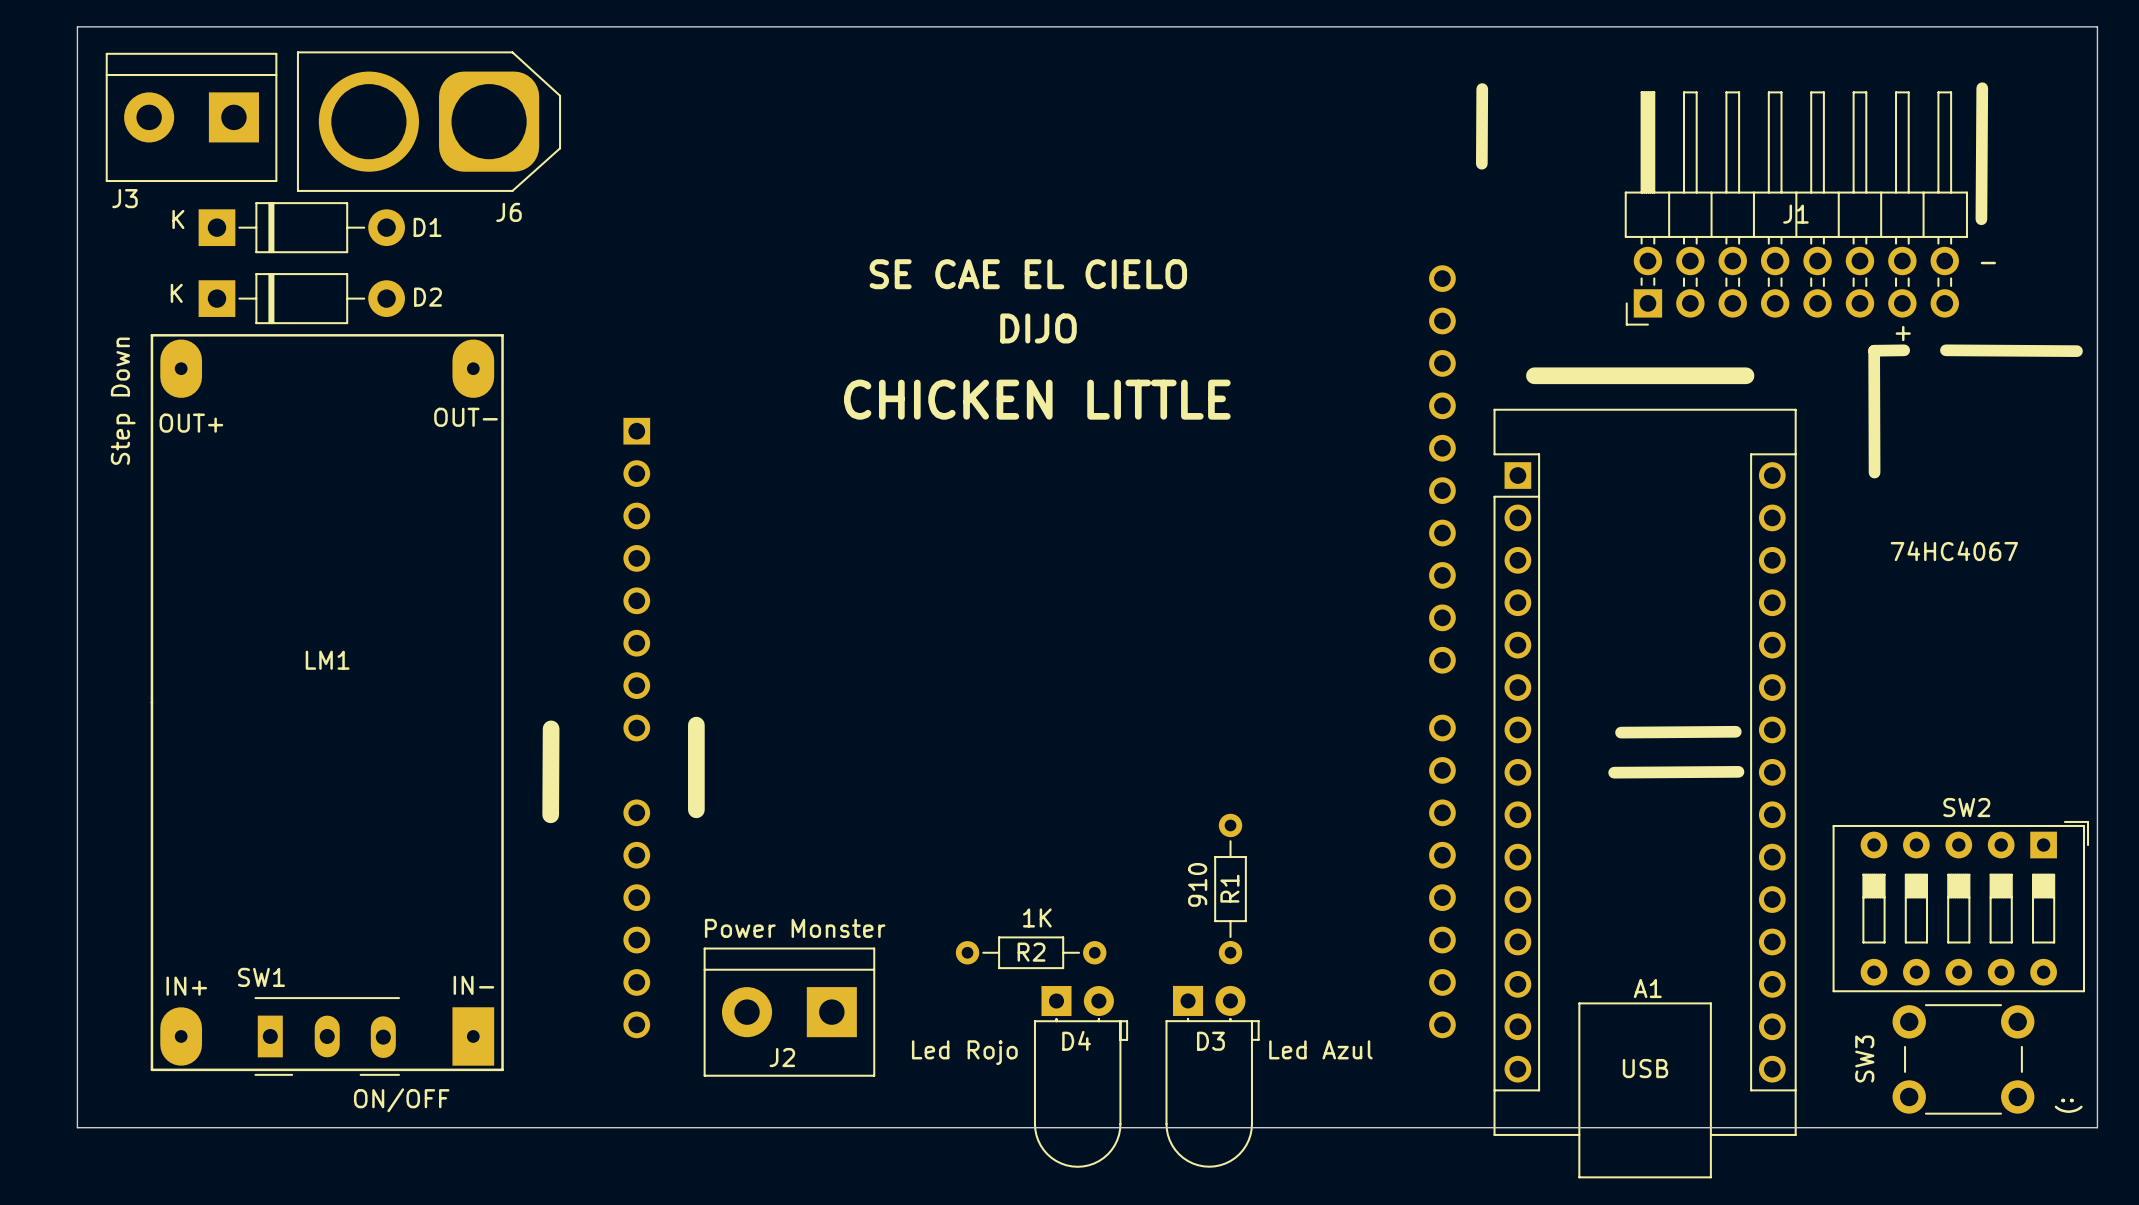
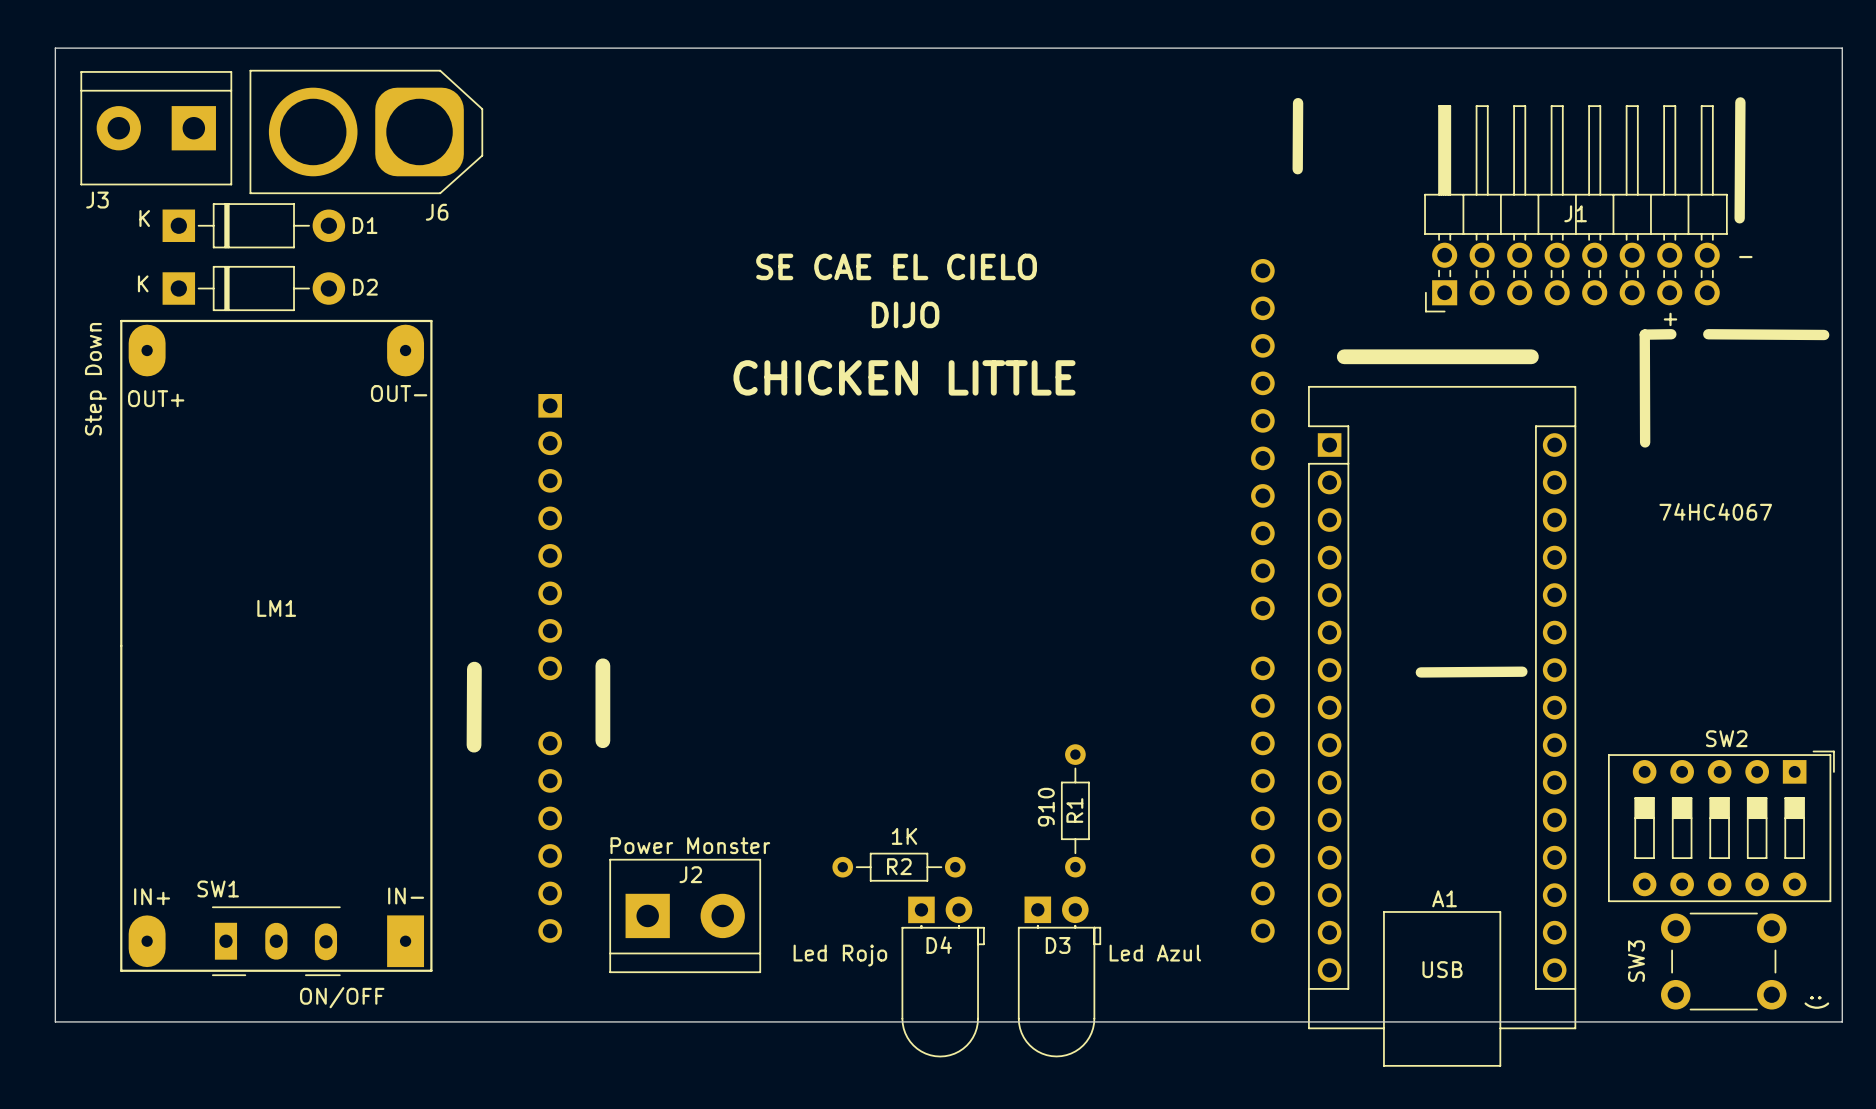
line: (1738, 771) (1614, 772) -> none
J2 rotation: 0° (789, 1012) -> 180° (685, 915)

